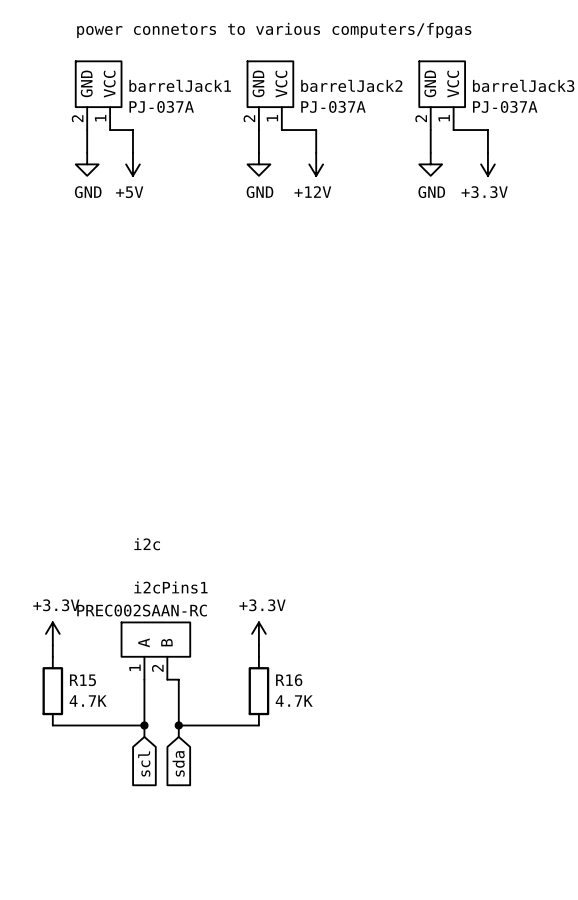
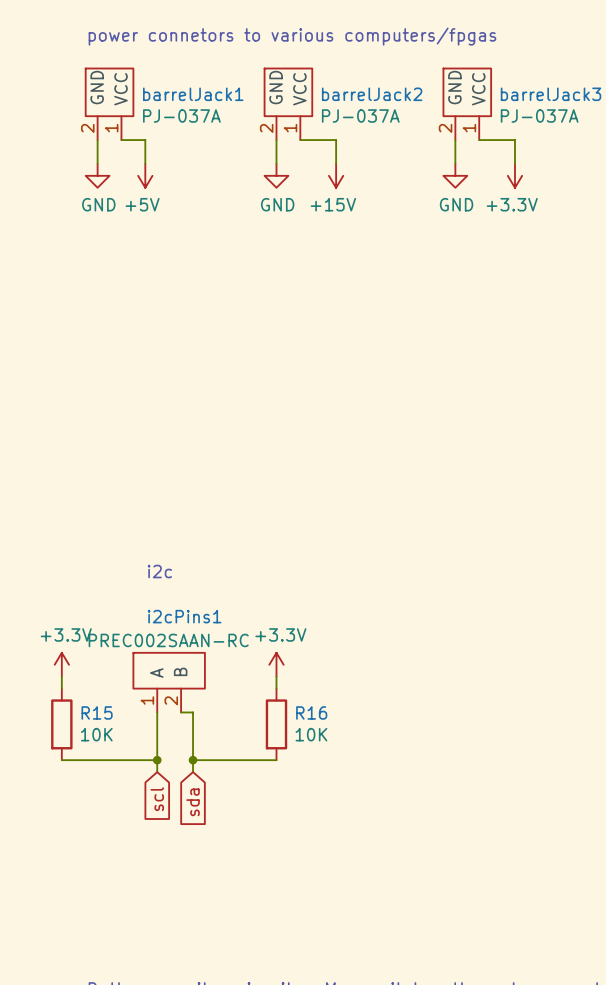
power symbol: +12V (316, 164) -> +15V (336, 175)
R15 value: 4.7K (88, 701) -> 10K (96, 734)
R16 value: 4.7K (294, 701) -> 10K (311, 734)

